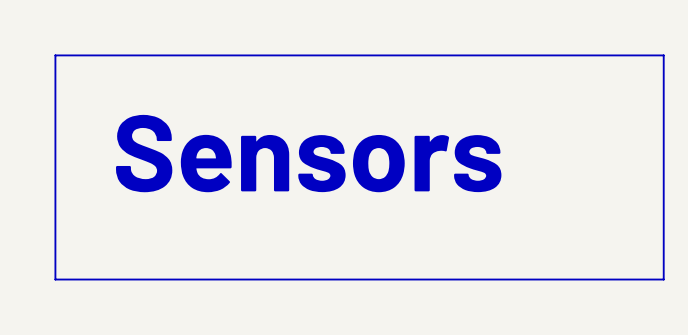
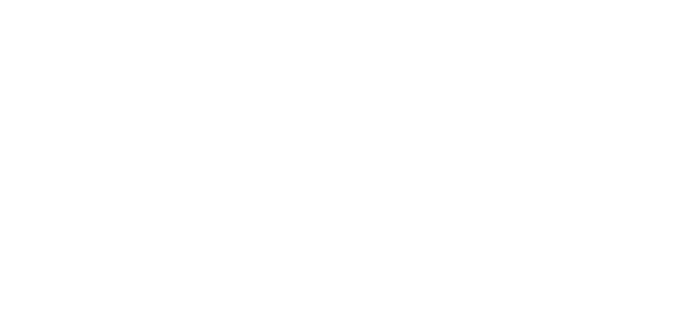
line: (55, 55) (663, 55) (663, 279) (55, 279) (55, 55) -> none
text: Sensors (308, 153) -> none

